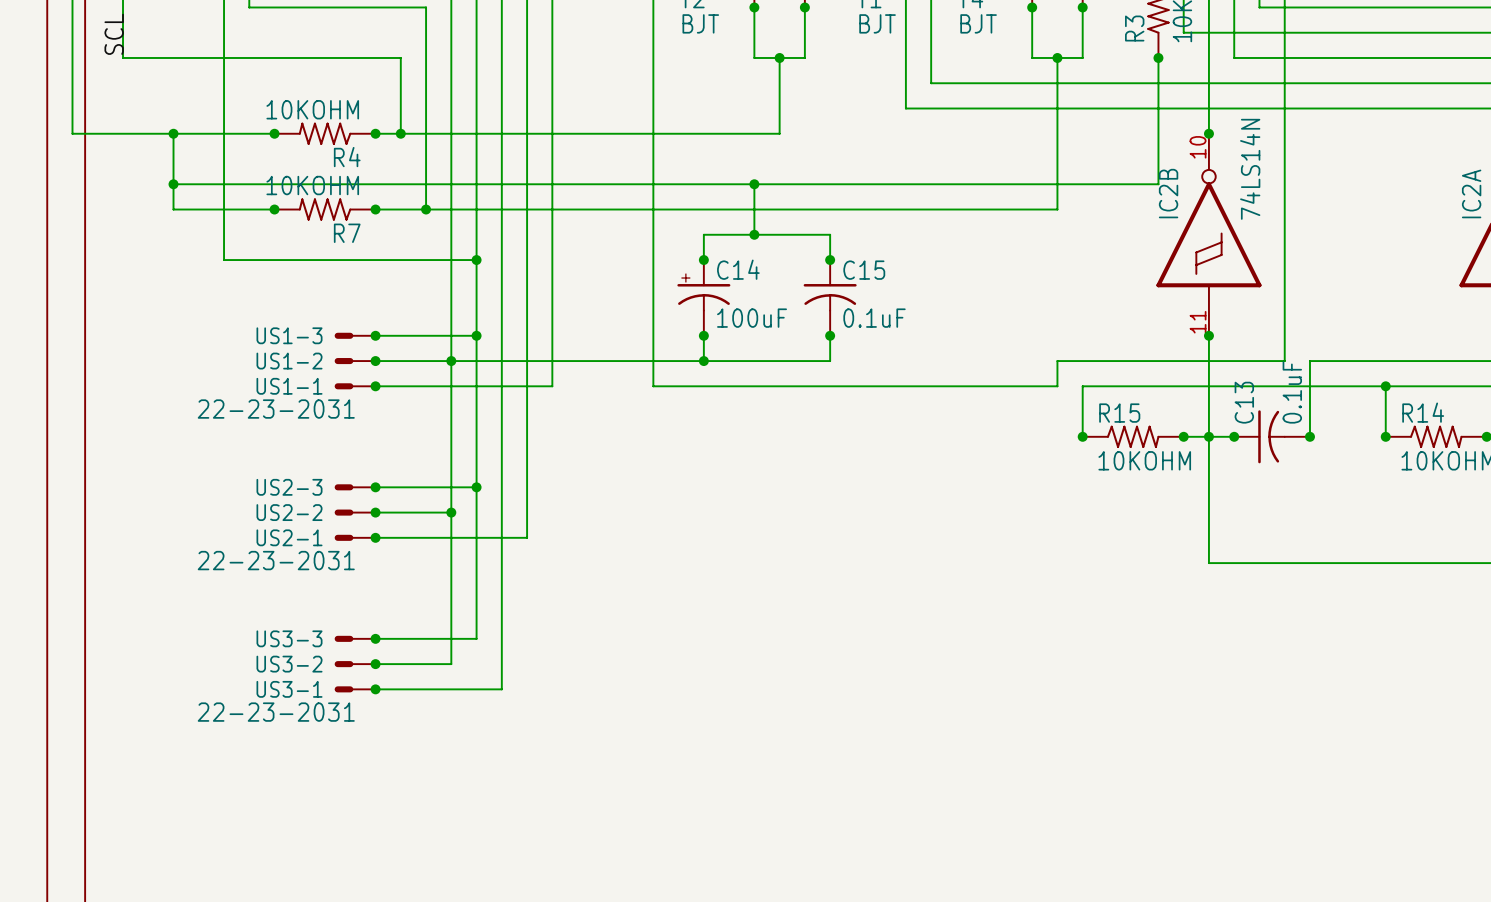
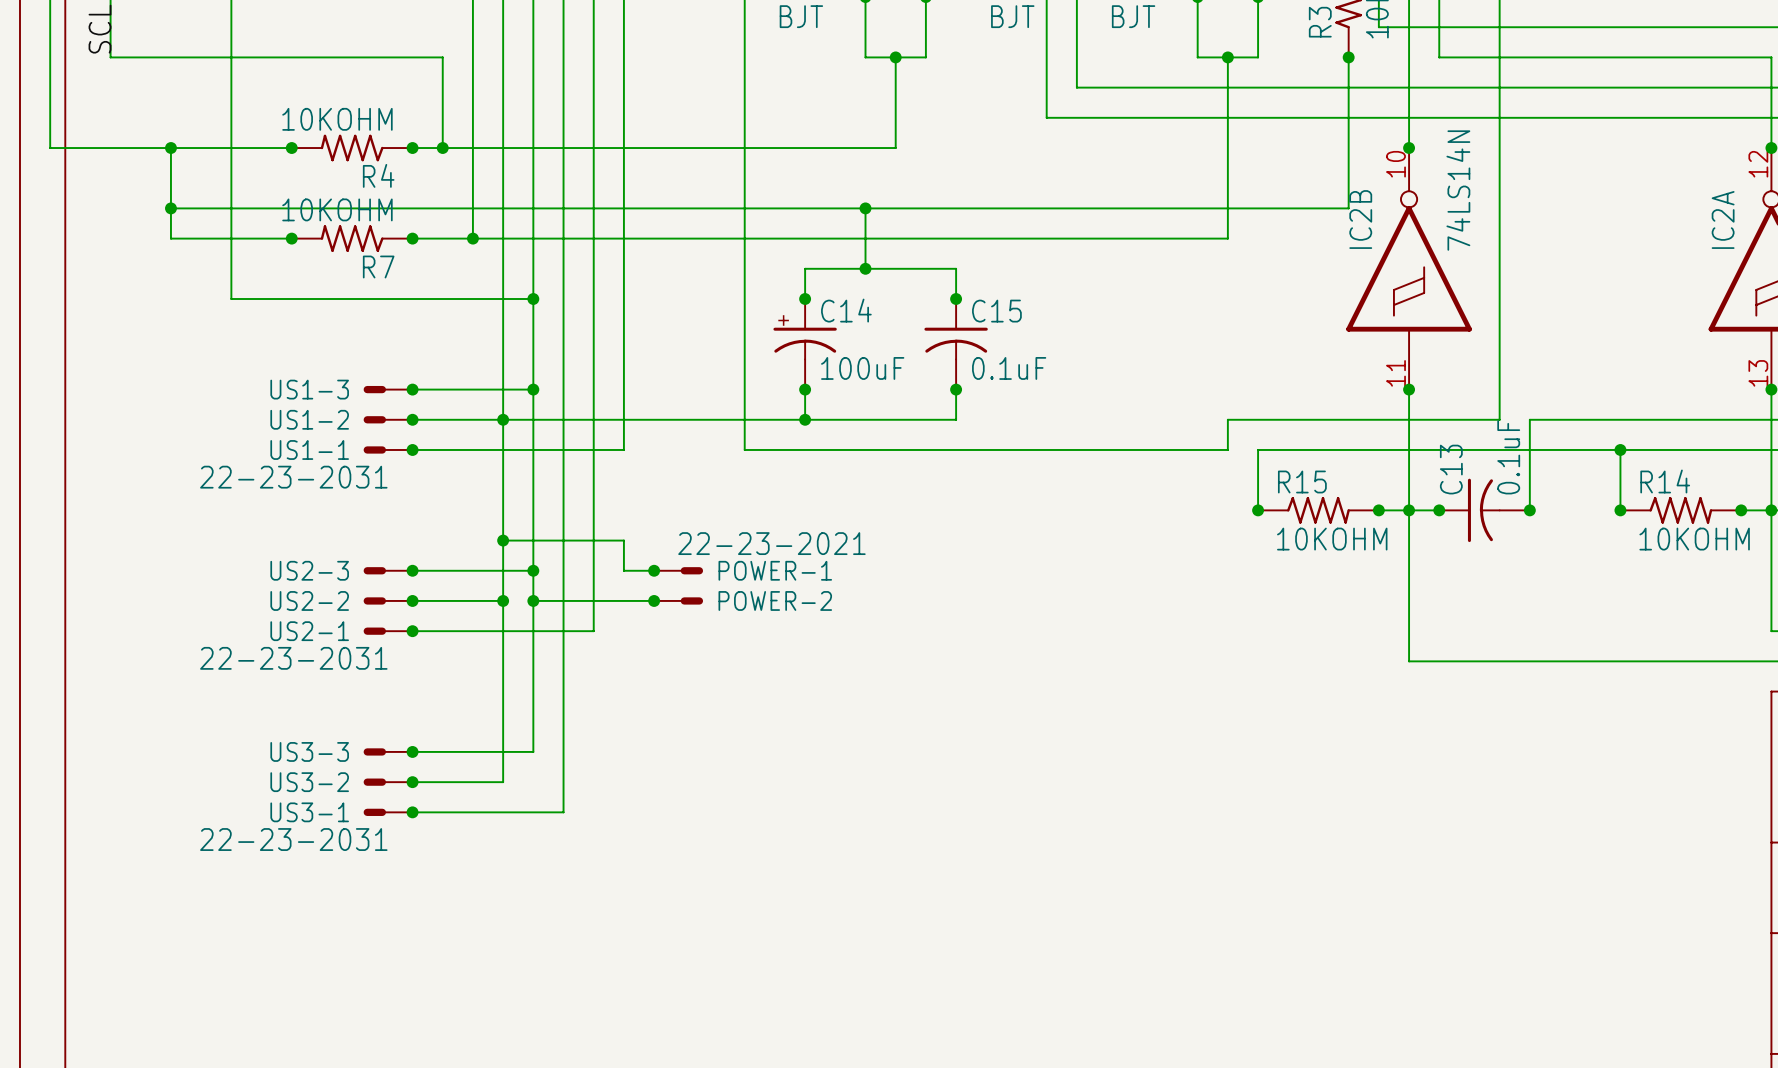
wire: none -> (503, 540) (623, 540) (623, 570) (654, 570)
junction: none -> (503, 540)
junction: none -> (654, 570)
POWER-1: none -> 22-23-2021 (678, 570)
wire: none -> (533, 600) (654, 600)
junction: none -> (533, 600)
junction: none -> (654, 600)
POWER-2: none -> (678, 600)

